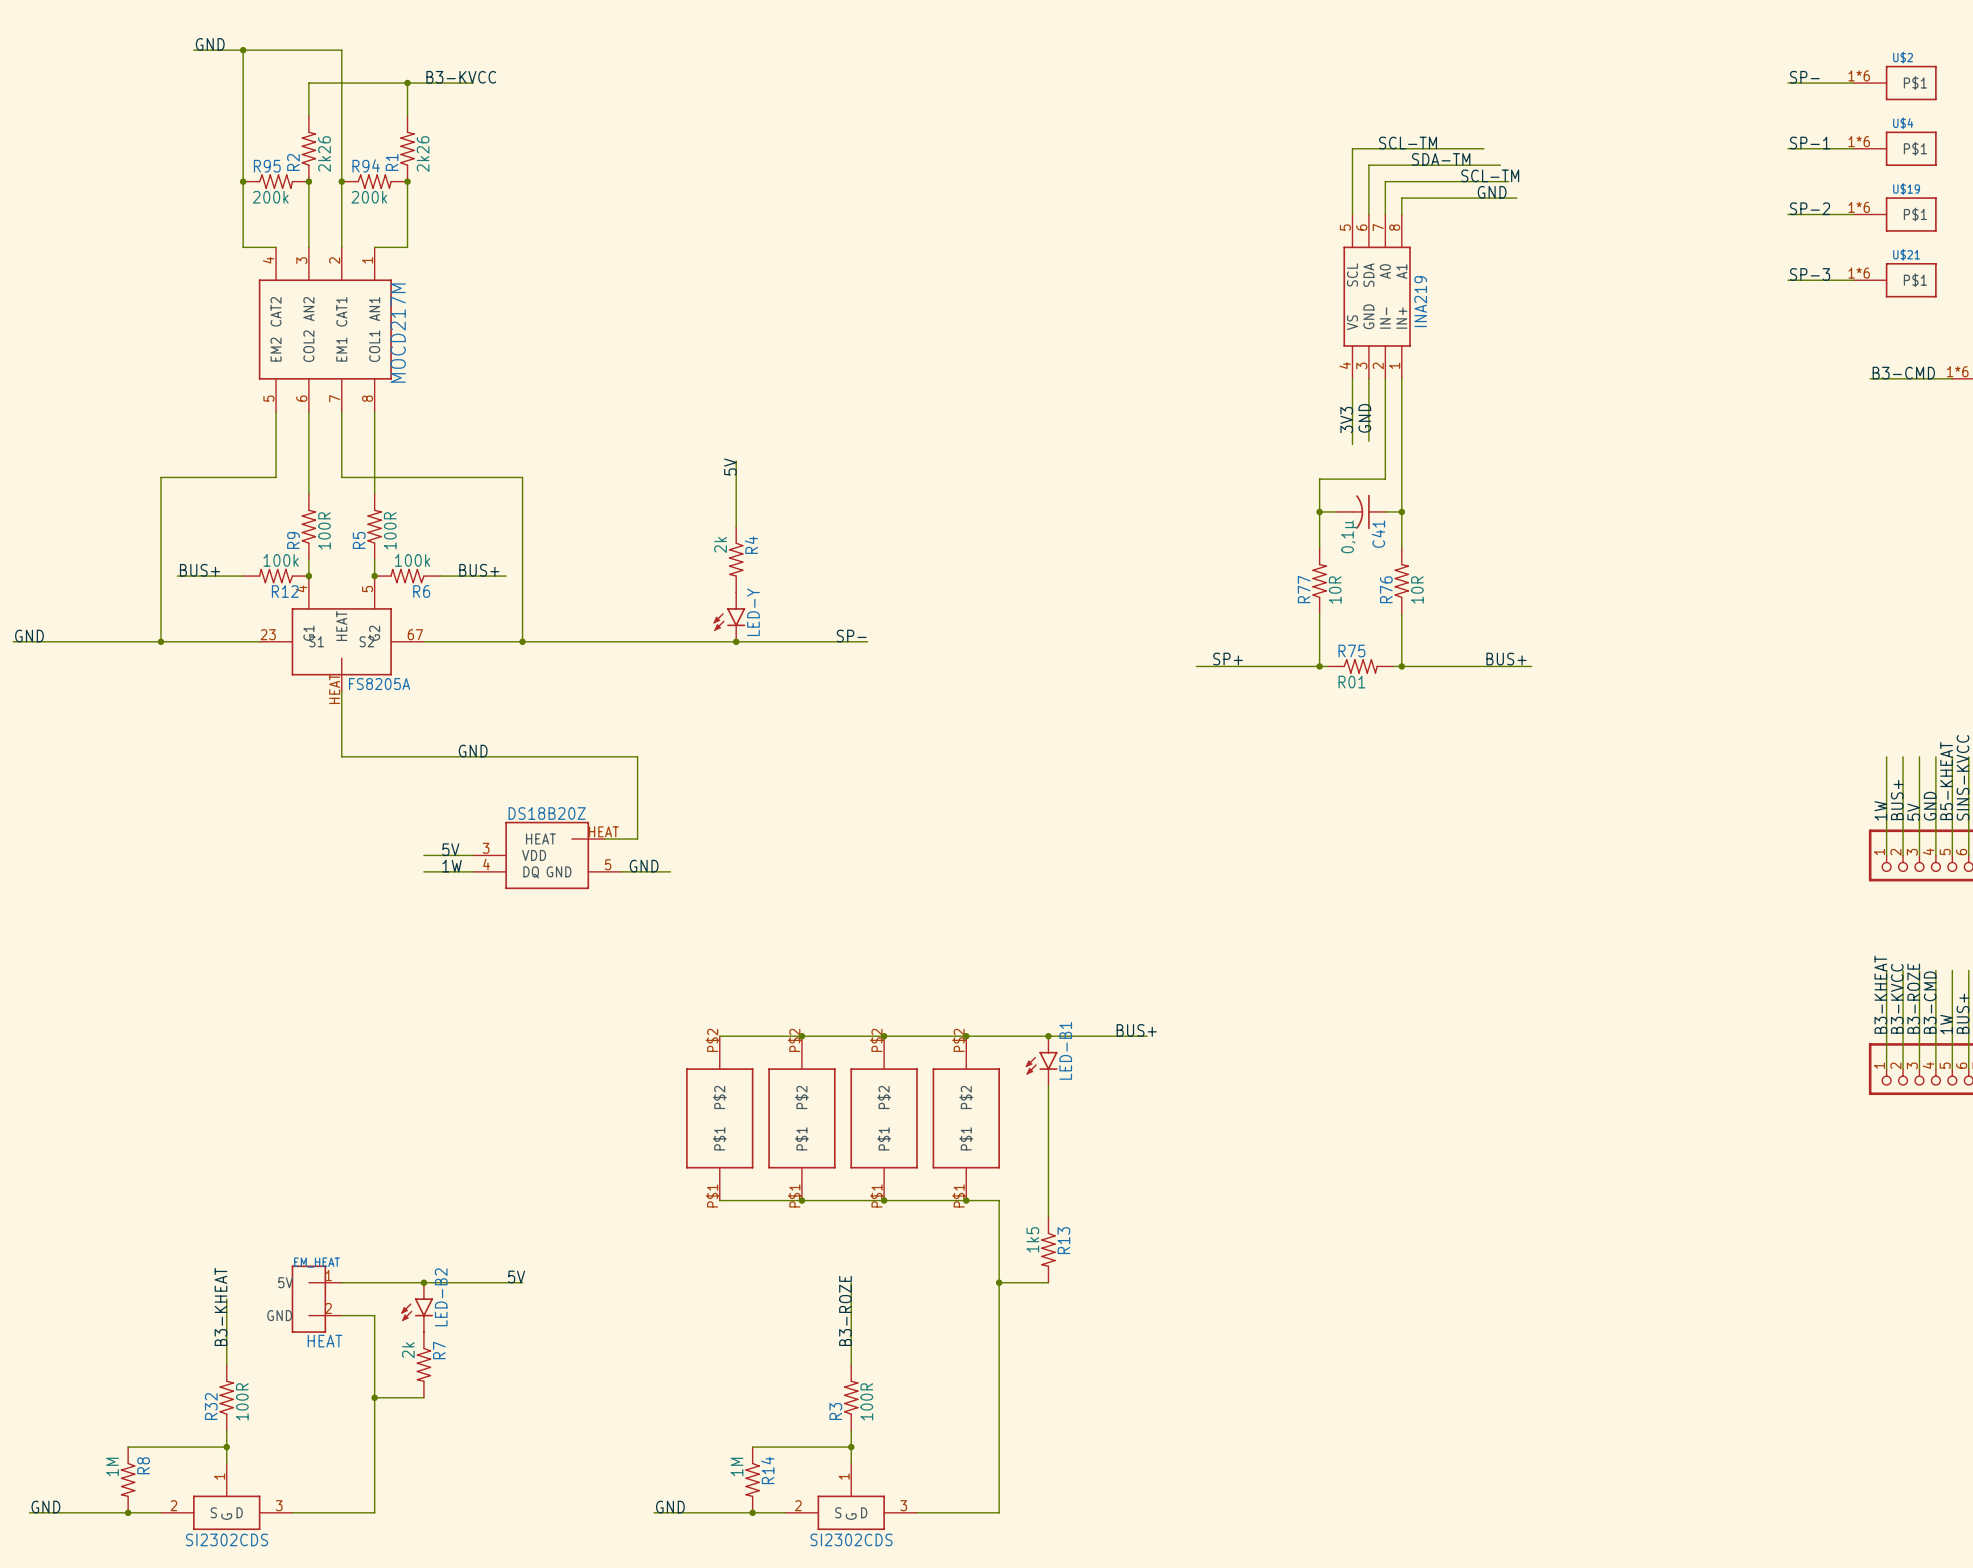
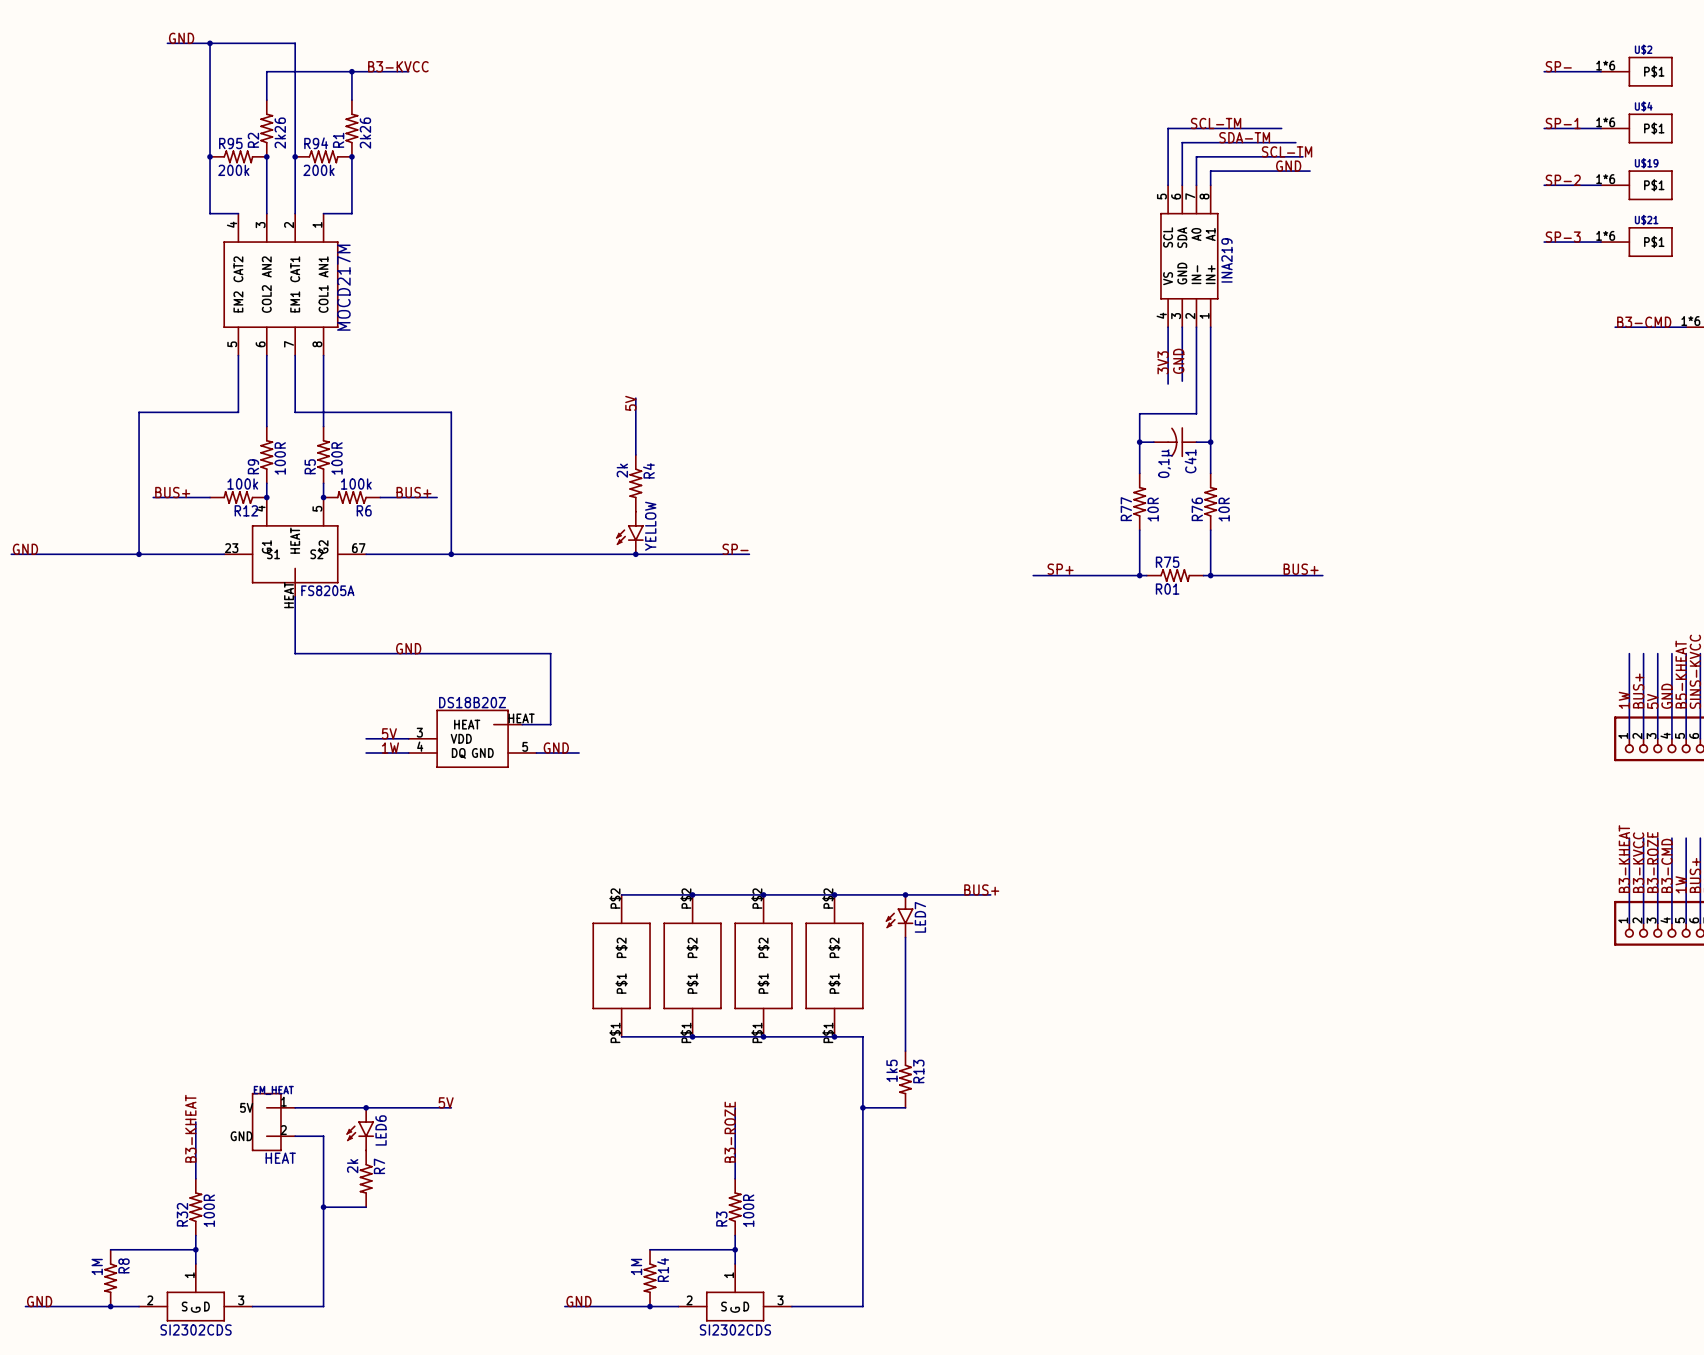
LED-Y name: LED-Y (753, 612) -> YELLOW (650, 526)
LED-B1 name: LED-B1 (1065, 1050) -> LED7 (920, 917)
LED-B2 name: LED-B2 (441, 1297) -> LED6 (381, 1130)

